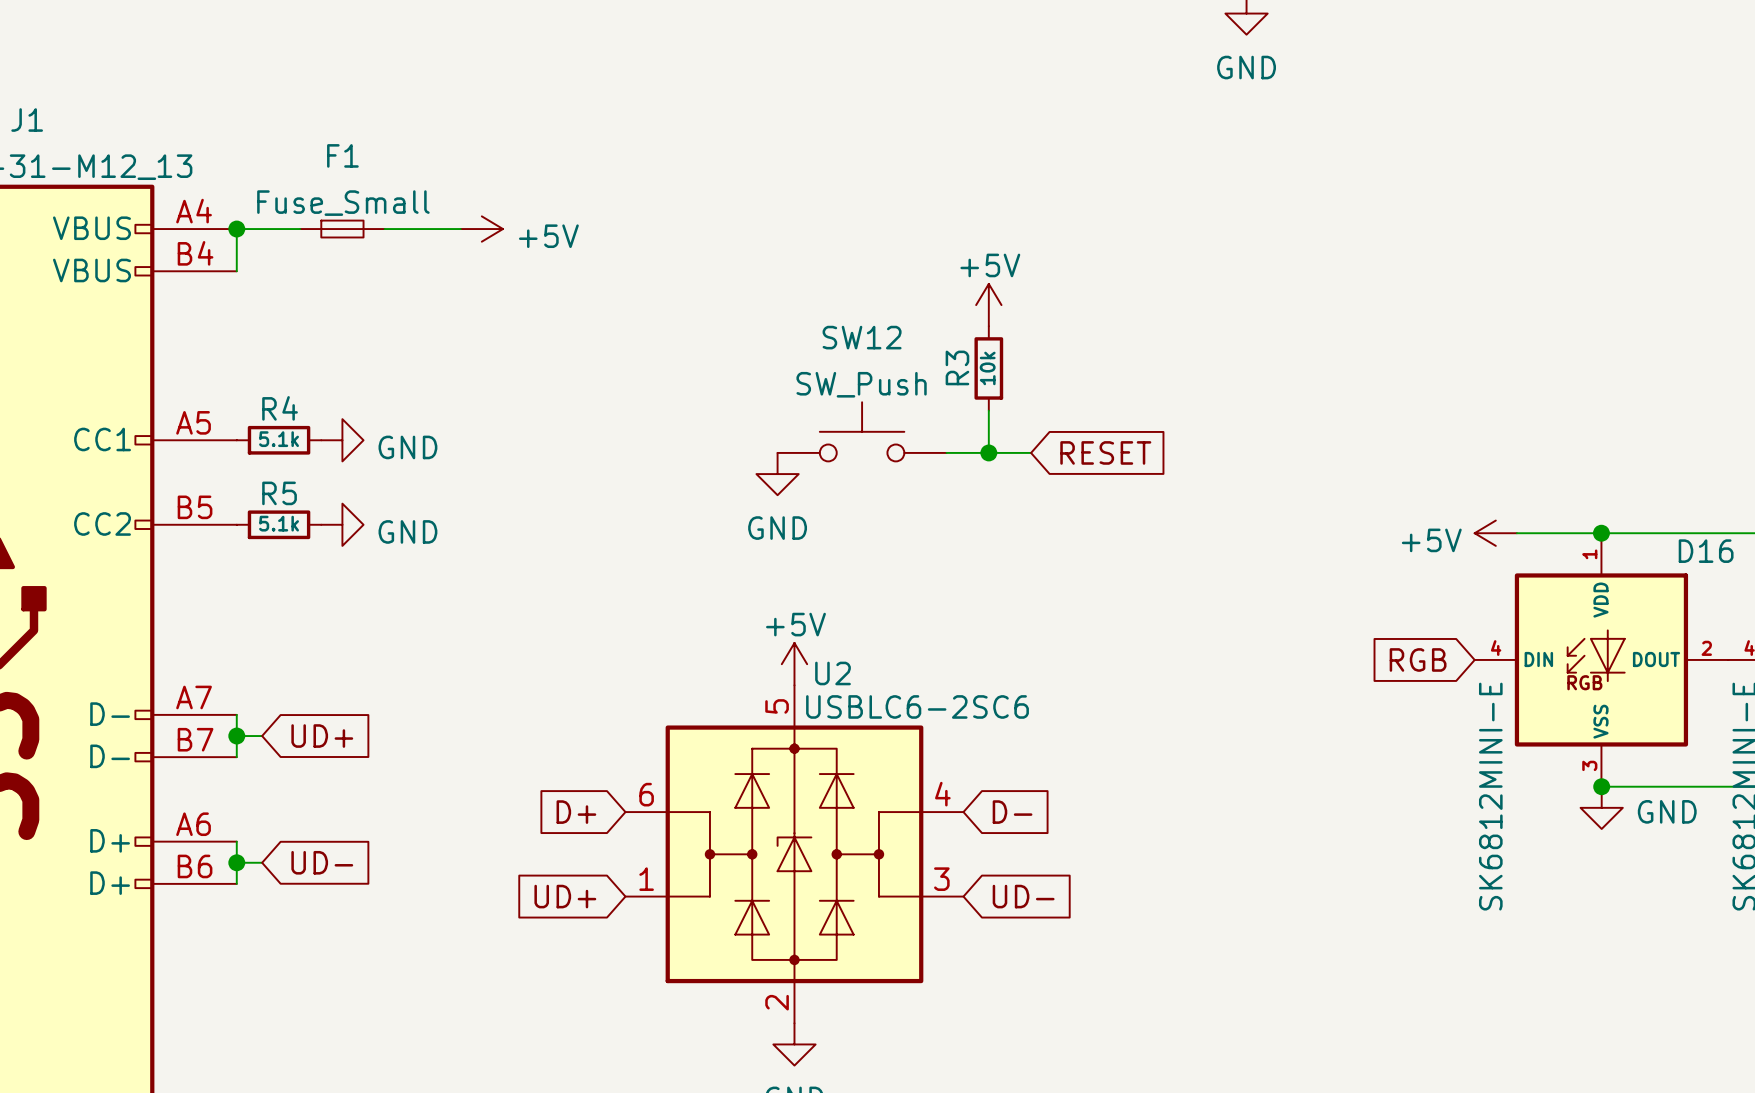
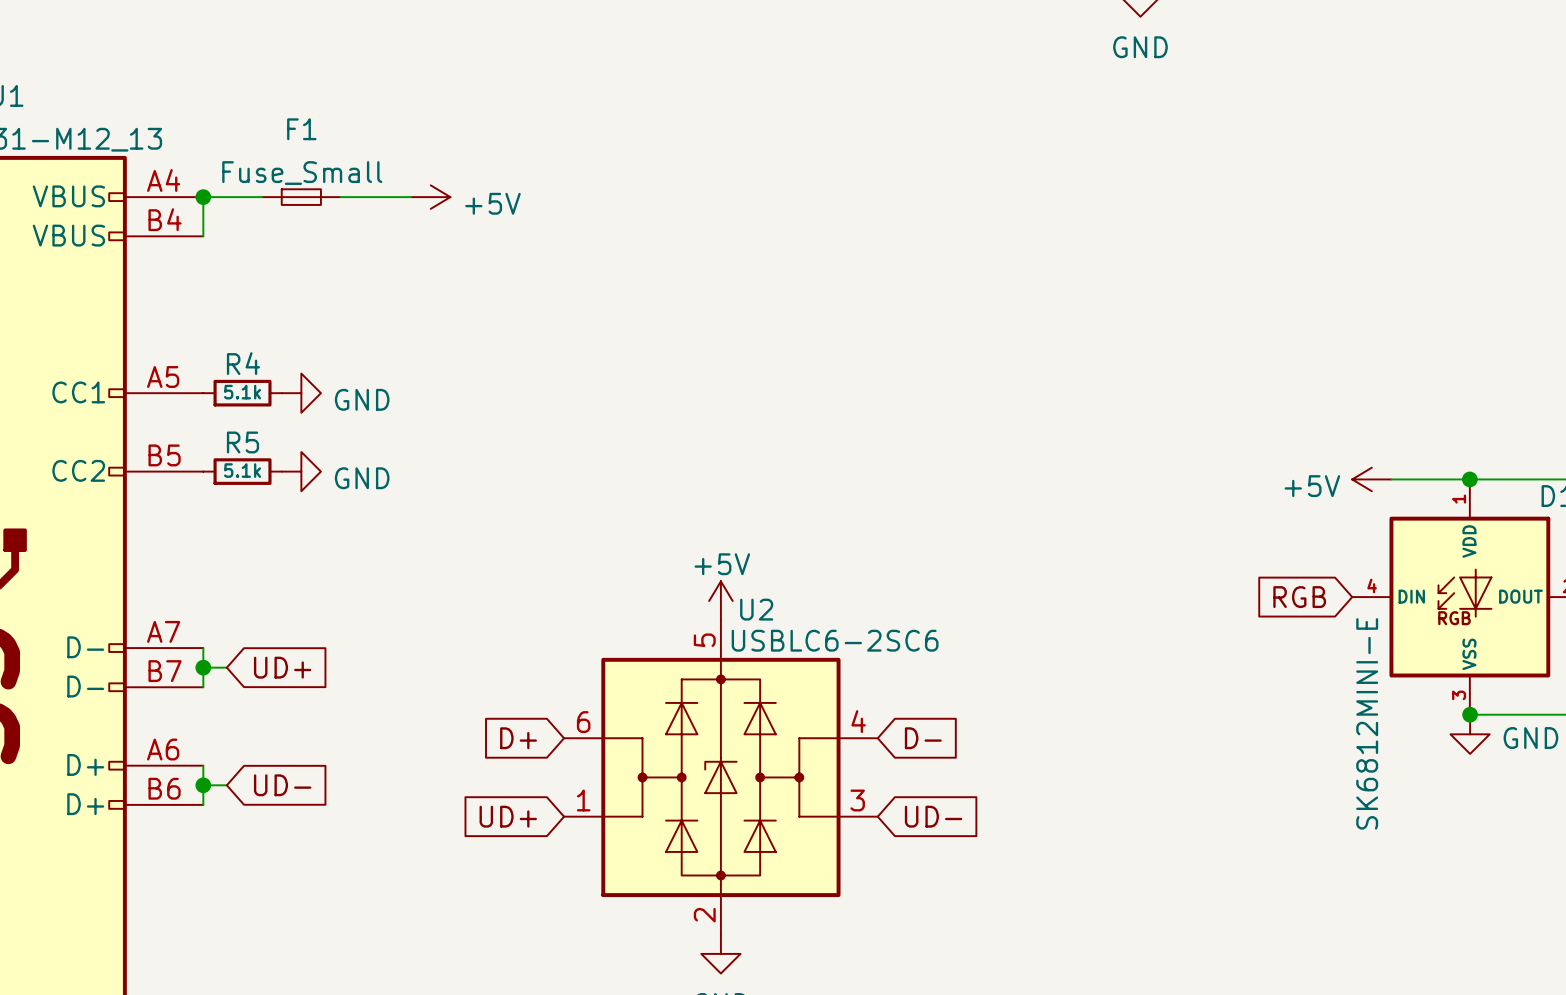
power symbol: +5V (988, 305) -> none
R3: 10k (988, 368) -> none
wire: (988, 410) (988, 452) -> none
SW12: SW_Push (862, 431) -> none
wire: (946, 452) (1031, 452) -> none
junction: (988, 452) -> none
global label: RESET (1105, 452) -> none
power symbol: GND (777, 474) -> none

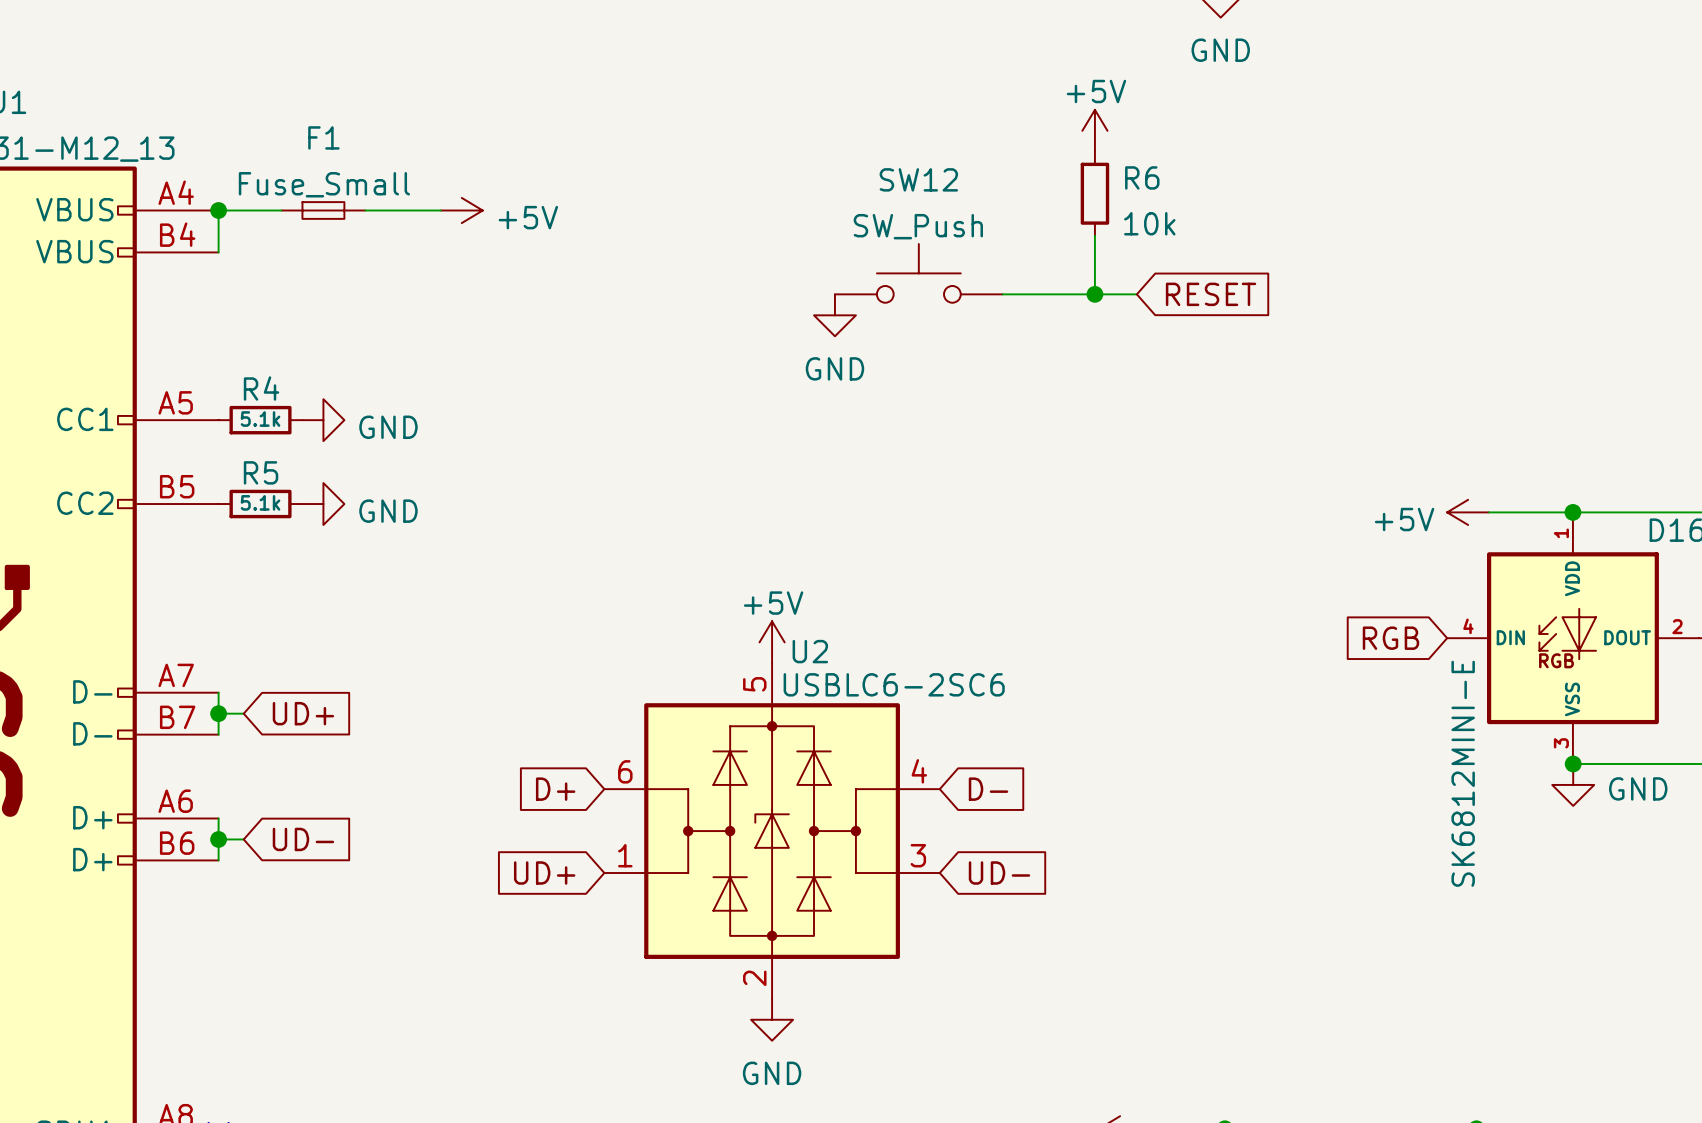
power symbol: none -> +5V (1094, 130)
R6: none -> 10k (1094, 193)
wire: none -> (1094, 235) (1094, 294)
SW12: none -> SW_Push (918, 273)
wire: none -> (1002, 294) (1136, 294)
junction: none -> (1094, 294)
global label: none -> RESET (1211, 294)
power symbol: none -> GND (834, 315)

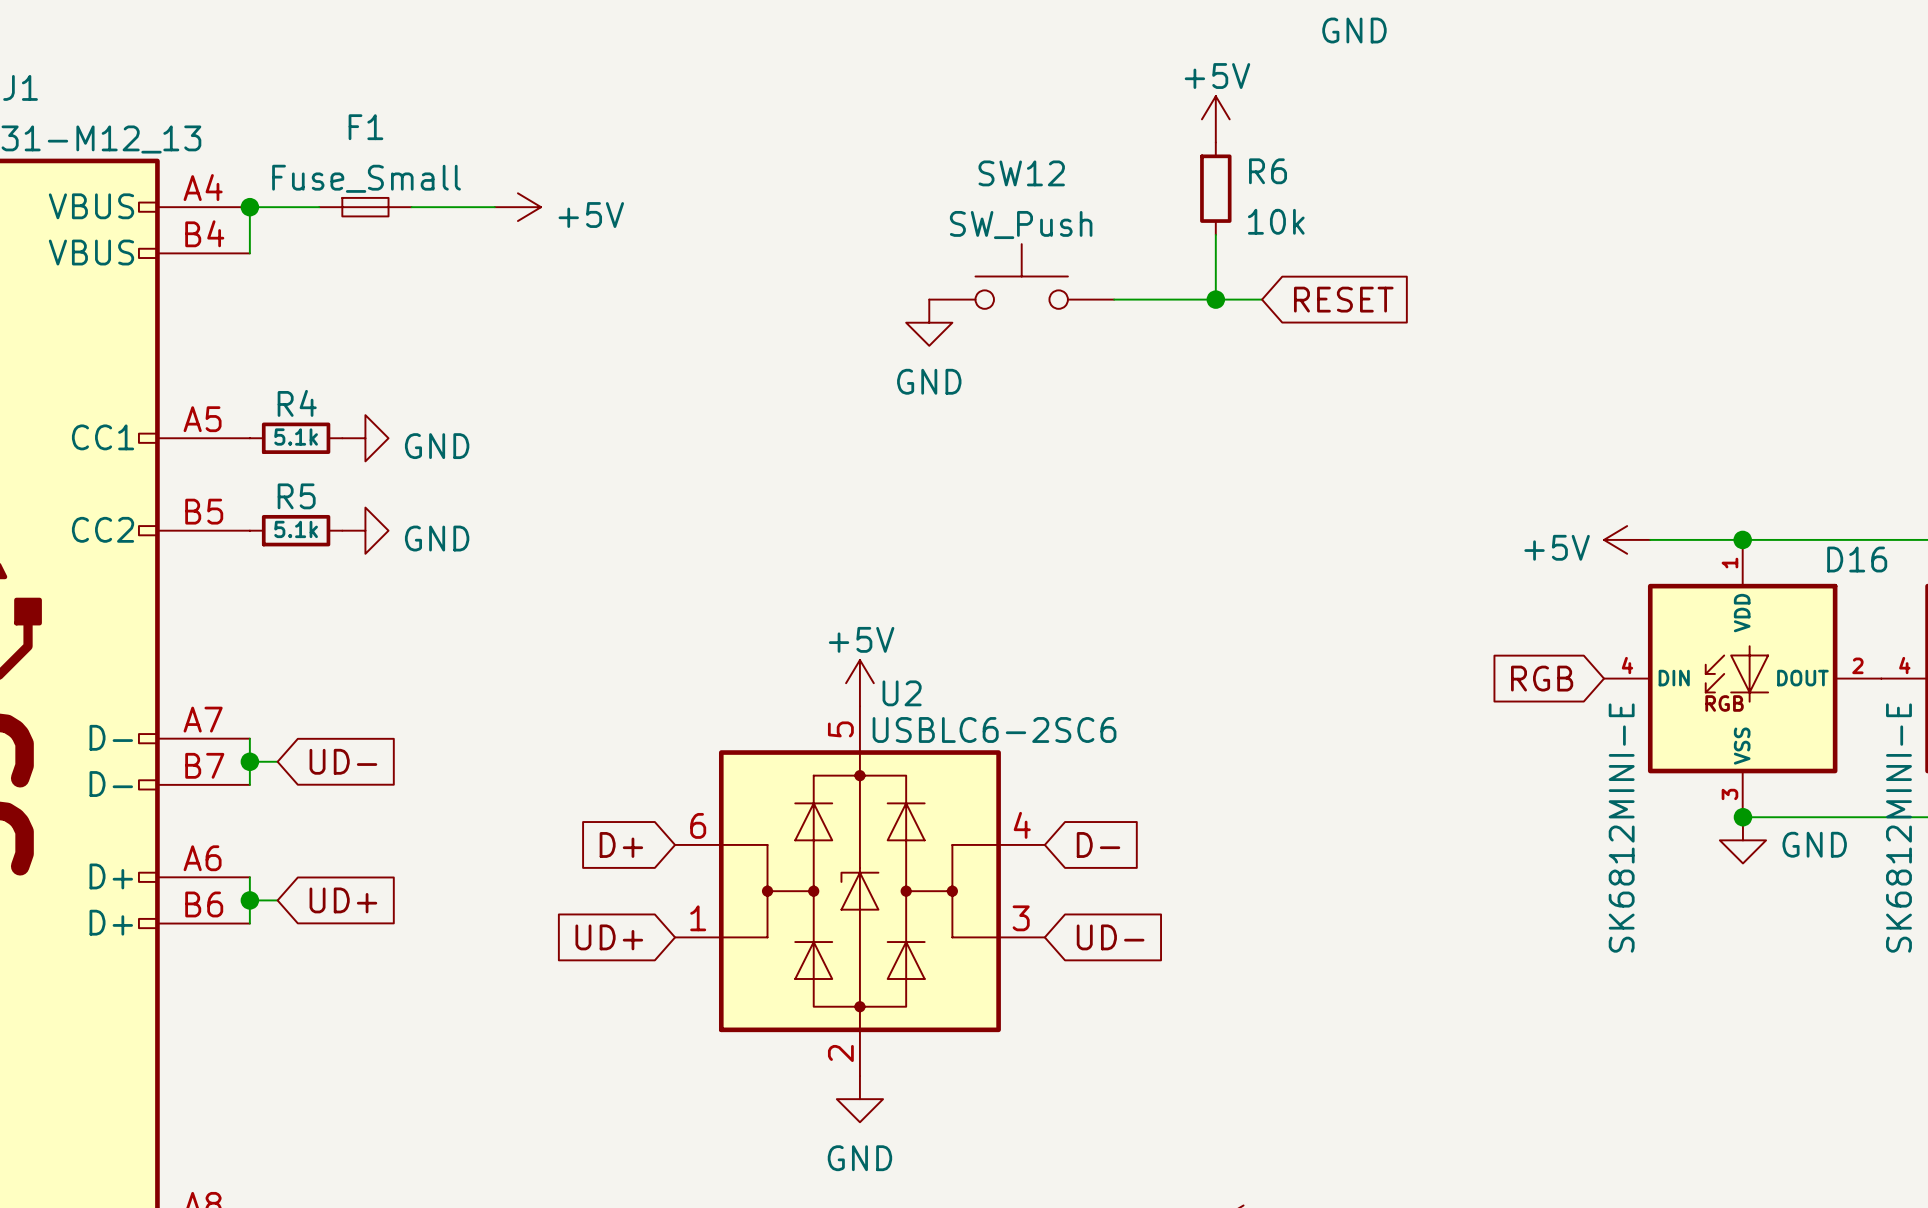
global label: UD+ (303, 713) -> UD- (343, 761)
global label: UD- (303, 839) -> UD+ (343, 900)

